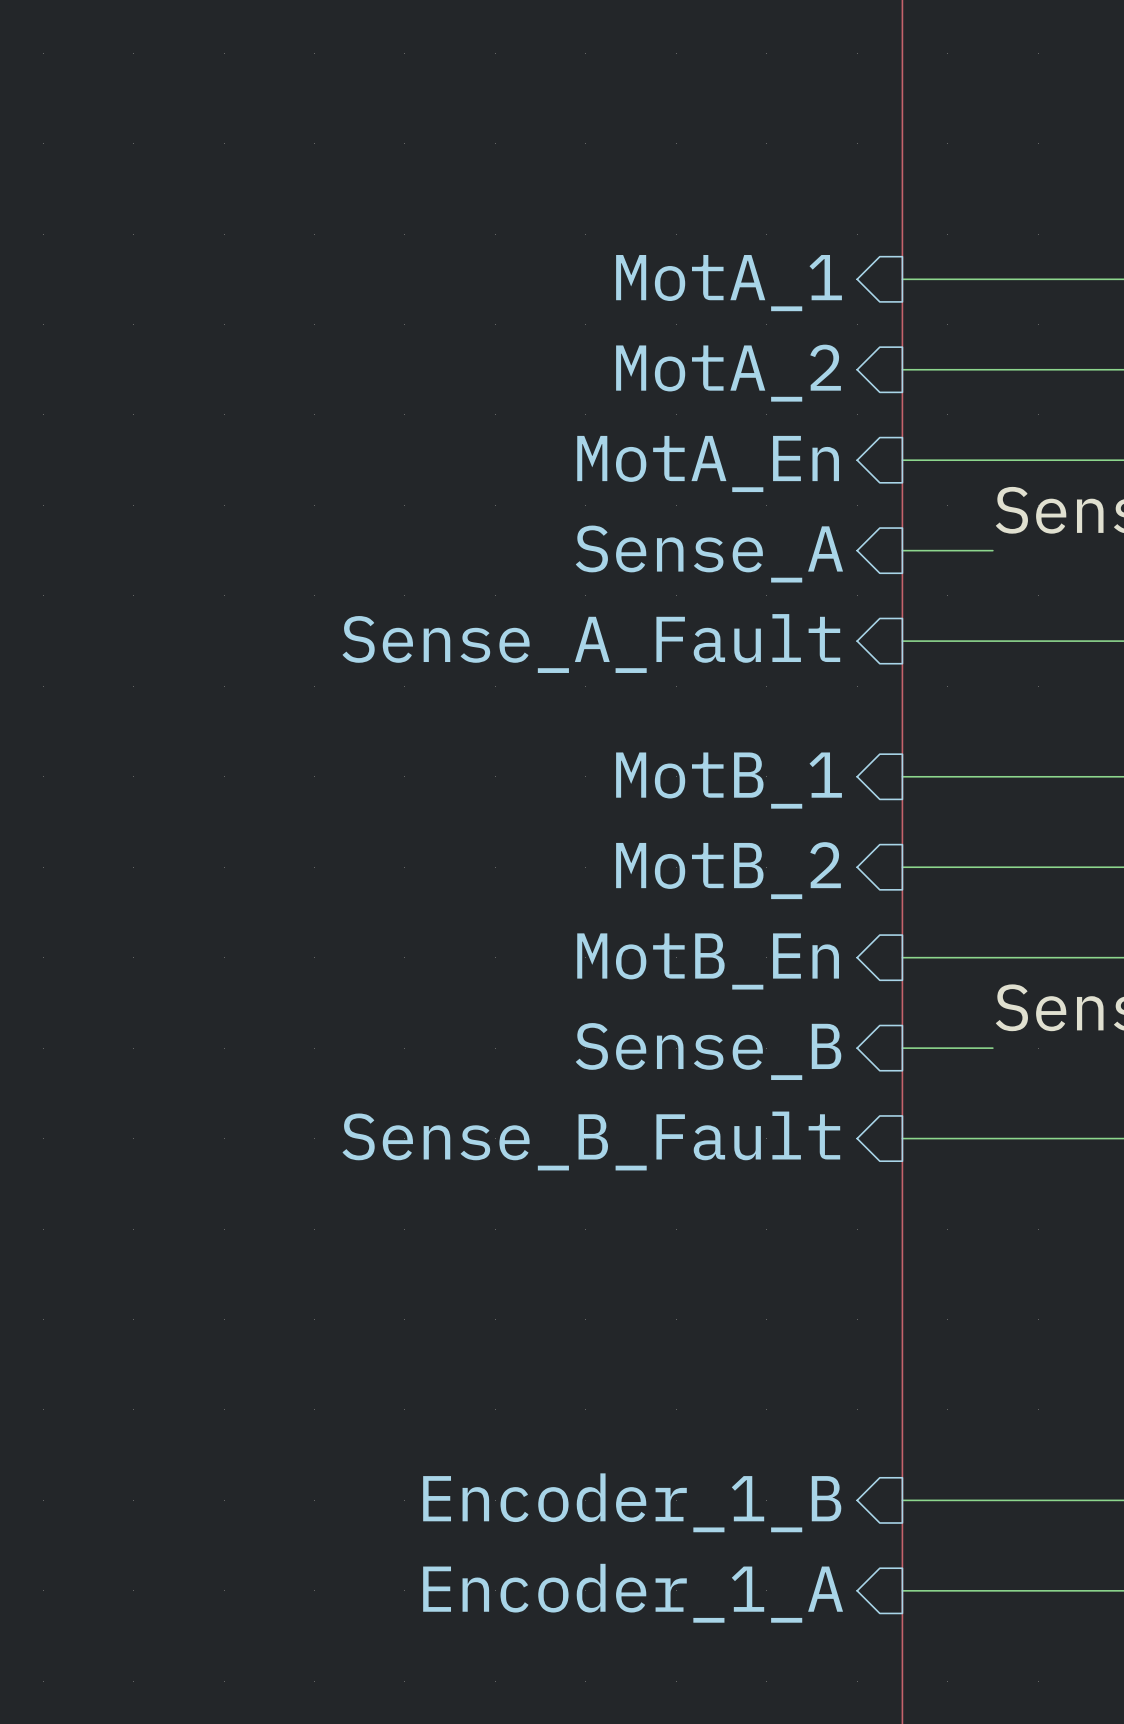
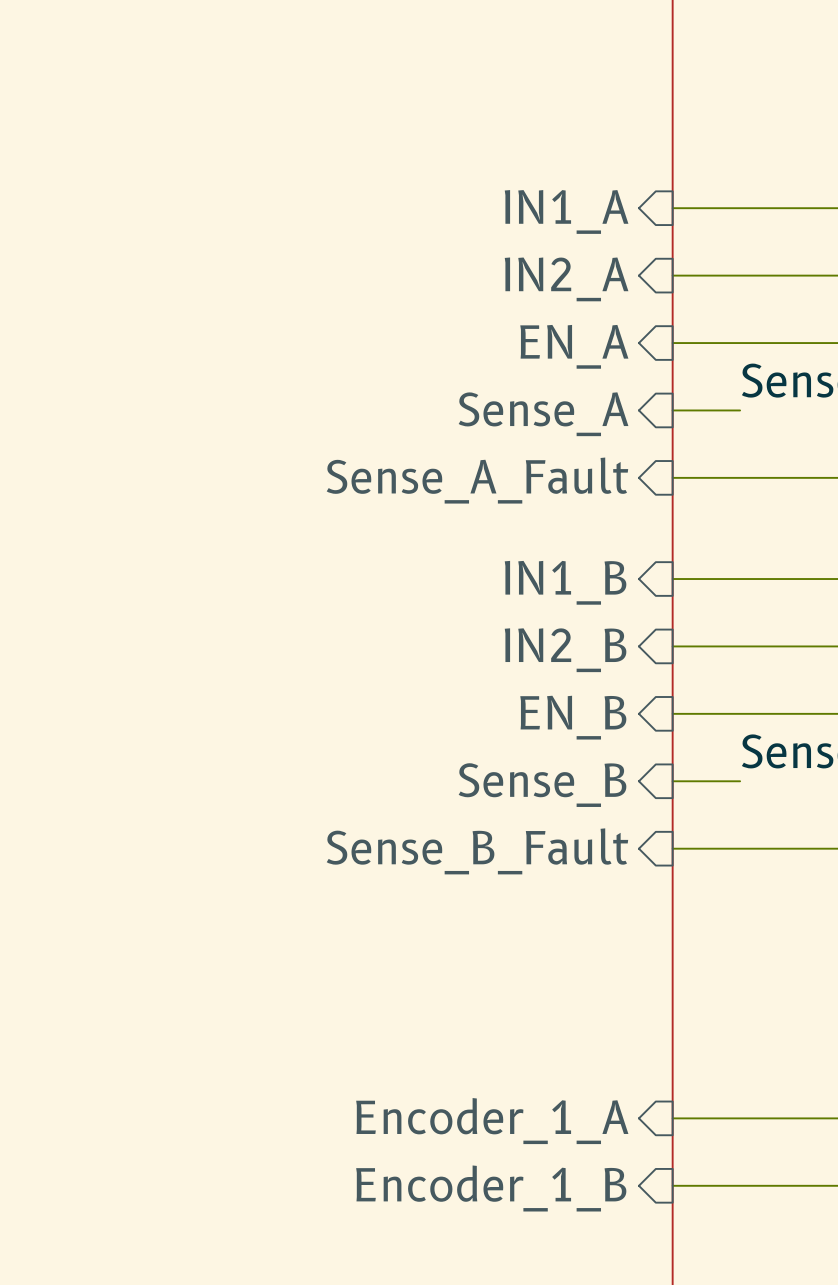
sheet pin: MotA_1 (729, 283) -> IN1_A (566, 211)
sheet pin: MotA_2 (728, 373) -> IN2_A (566, 279)
sheet pin: MotA_En (708, 463) -> EN_A (574, 346)
sheet pin: MotB_1 (729, 780) -> IN1_B (565, 582)
sheet pin: MotB_2 (728, 870) -> IN2_B (565, 650)
sheet pin: MotB_En (708, 961) -> EN_B (573, 717)
sheet pin: Encoder_1_B (632, 1502) -> Encoder_1_A (492, 1121)
sheet pin: Encoder_1_A (633, 1593) -> Encoder_1_B (491, 1188)

